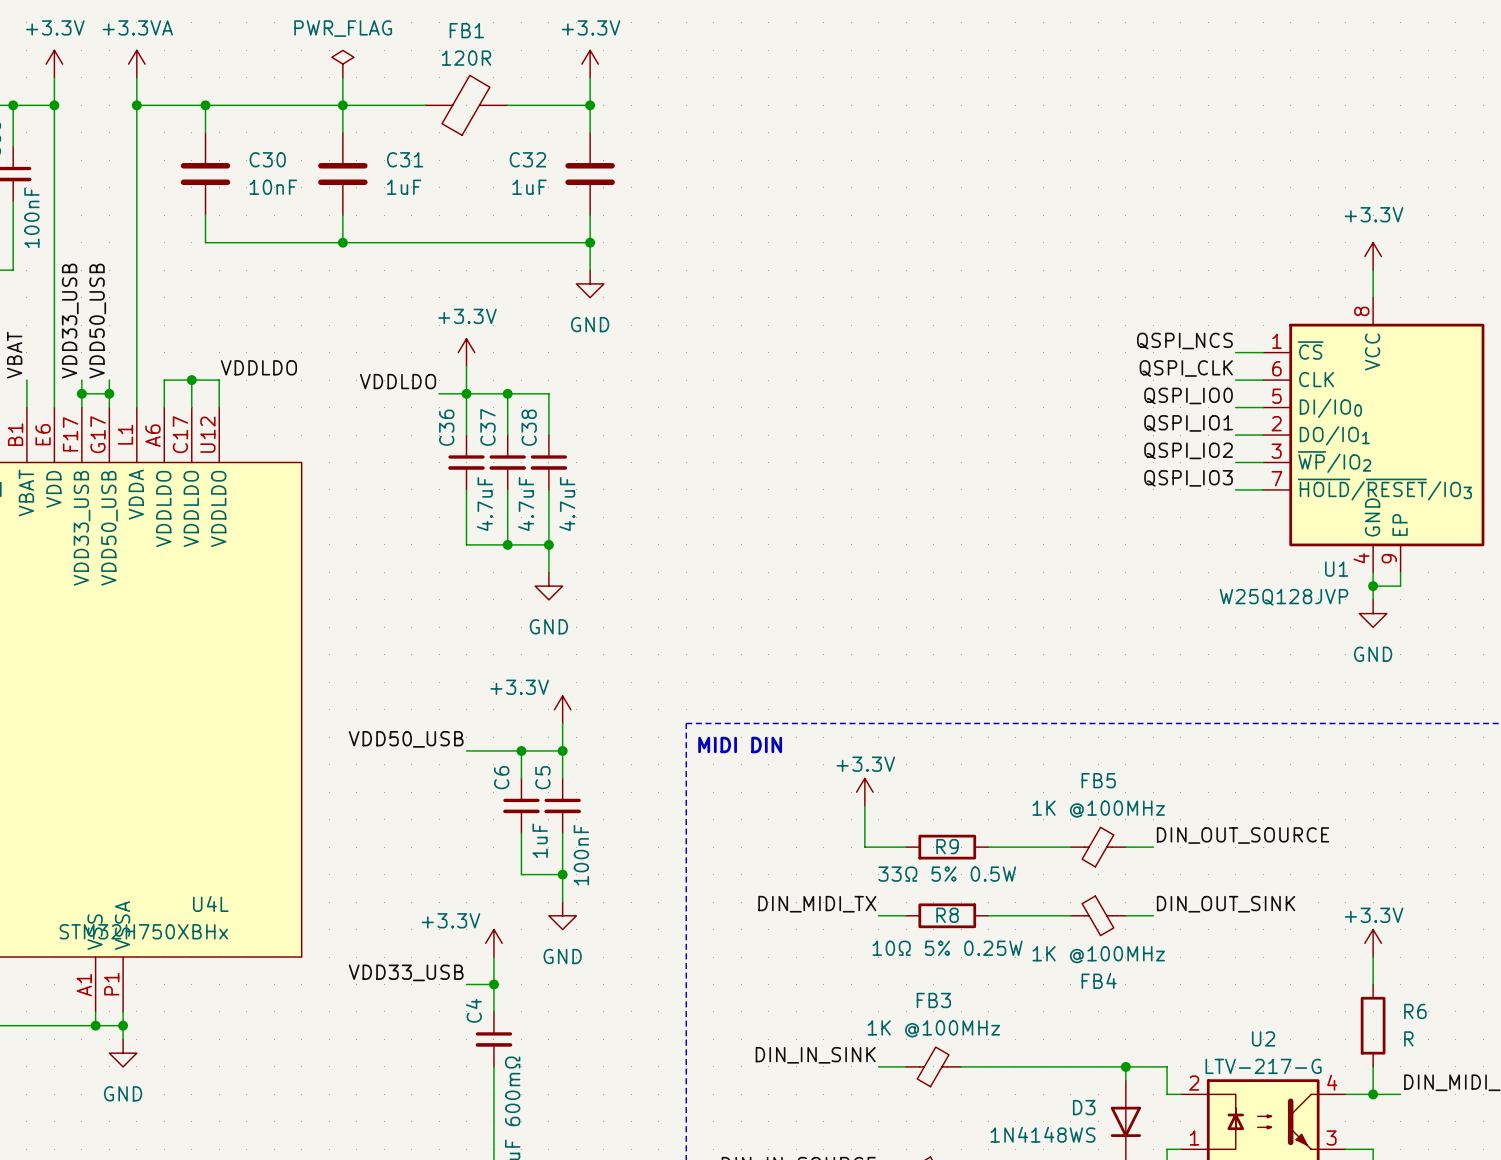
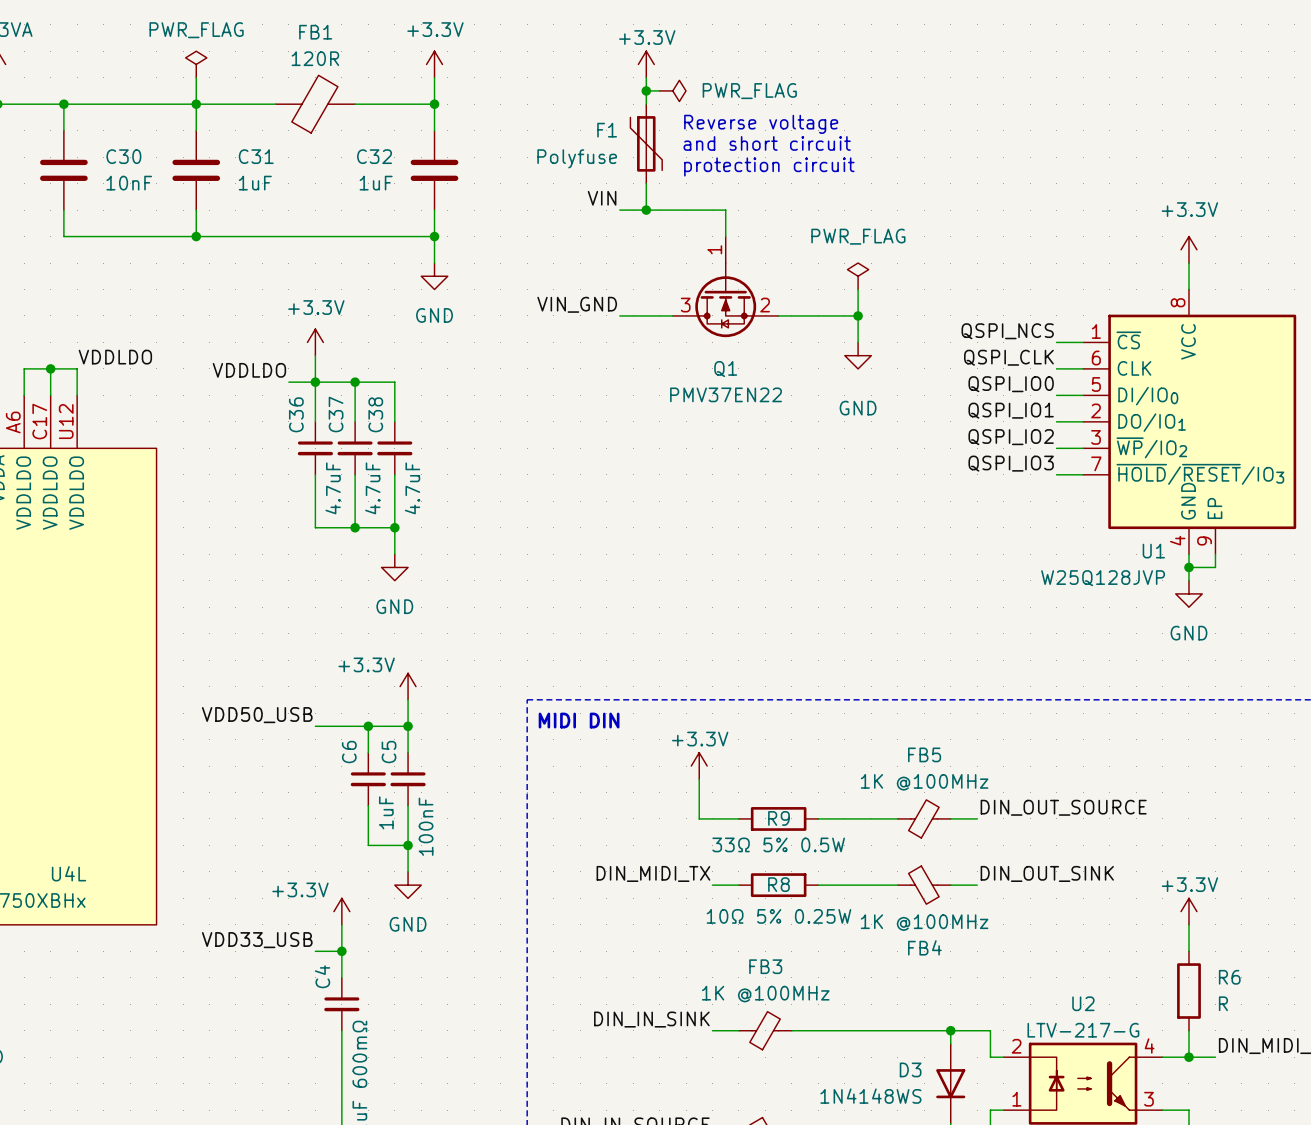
power symbol: none -> +3.3V (646, 64)
wire: none -> (646, 77) (646, 104)
wire: none -> (646, 90) (659, 90)
junction: none -> (646, 90)
power symbol: none -> PWR_FLAG (672, 90)
text: none -> Reverse voltage (761, 124)
F1: none -> Polyfuse (646, 143)
text: none -> and short circuit (767, 143)
text: none -> protection circuit (769, 166)
wire: none -> (646, 183) (646, 210)
label: none -> VIN (602, 198)
wire: none -> (619, 210) (725, 210) (725, 236)
junction: none -> (646, 210)
power symbol: none -> PWR_FLAG (858, 276)
Q1: none -> PMV37EN22 (725, 286)
wire: none -> (858, 289) (858, 342)
label: none -> VIN_GND (577, 304)
wire: none -> (619, 315) (672, 315)
wire: none -> (778, 315) (858, 315)
junction: none -> (858, 315)
power symbol: none -> GND (858, 355)

